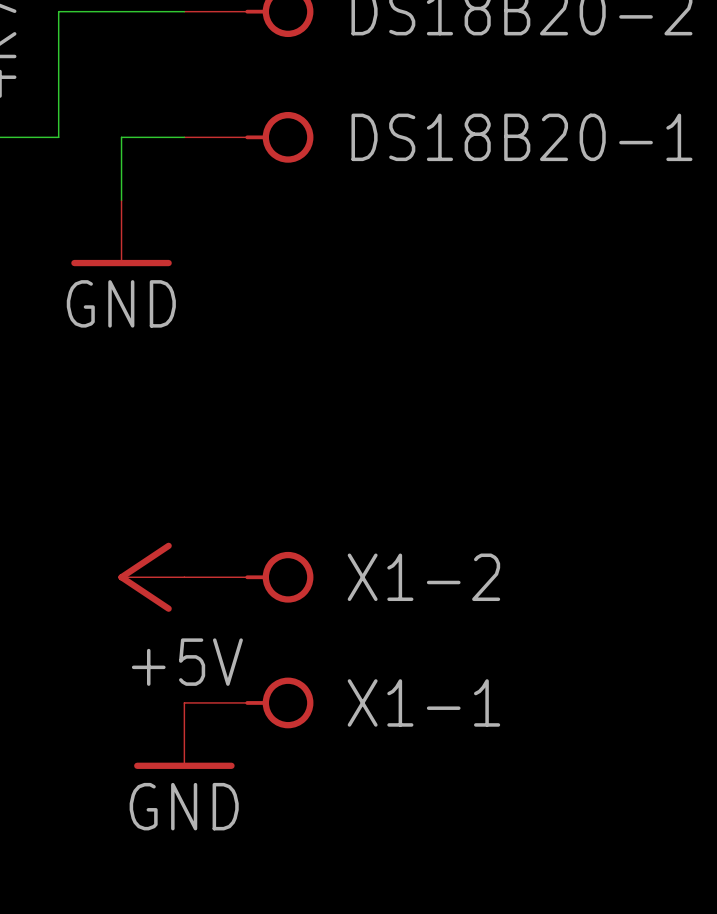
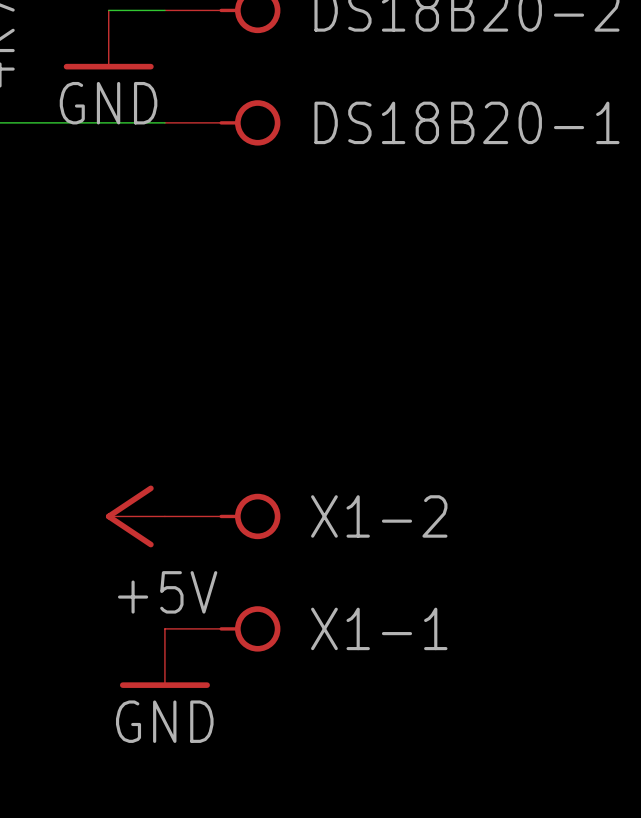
wire: (121, 11) (58, 11) (58, 137) -> none
wire: (121, 137) (121, 200) -> (108, 122) (52, 122)
power symbol position: GND (121, 233) -> GND (108, 39)

